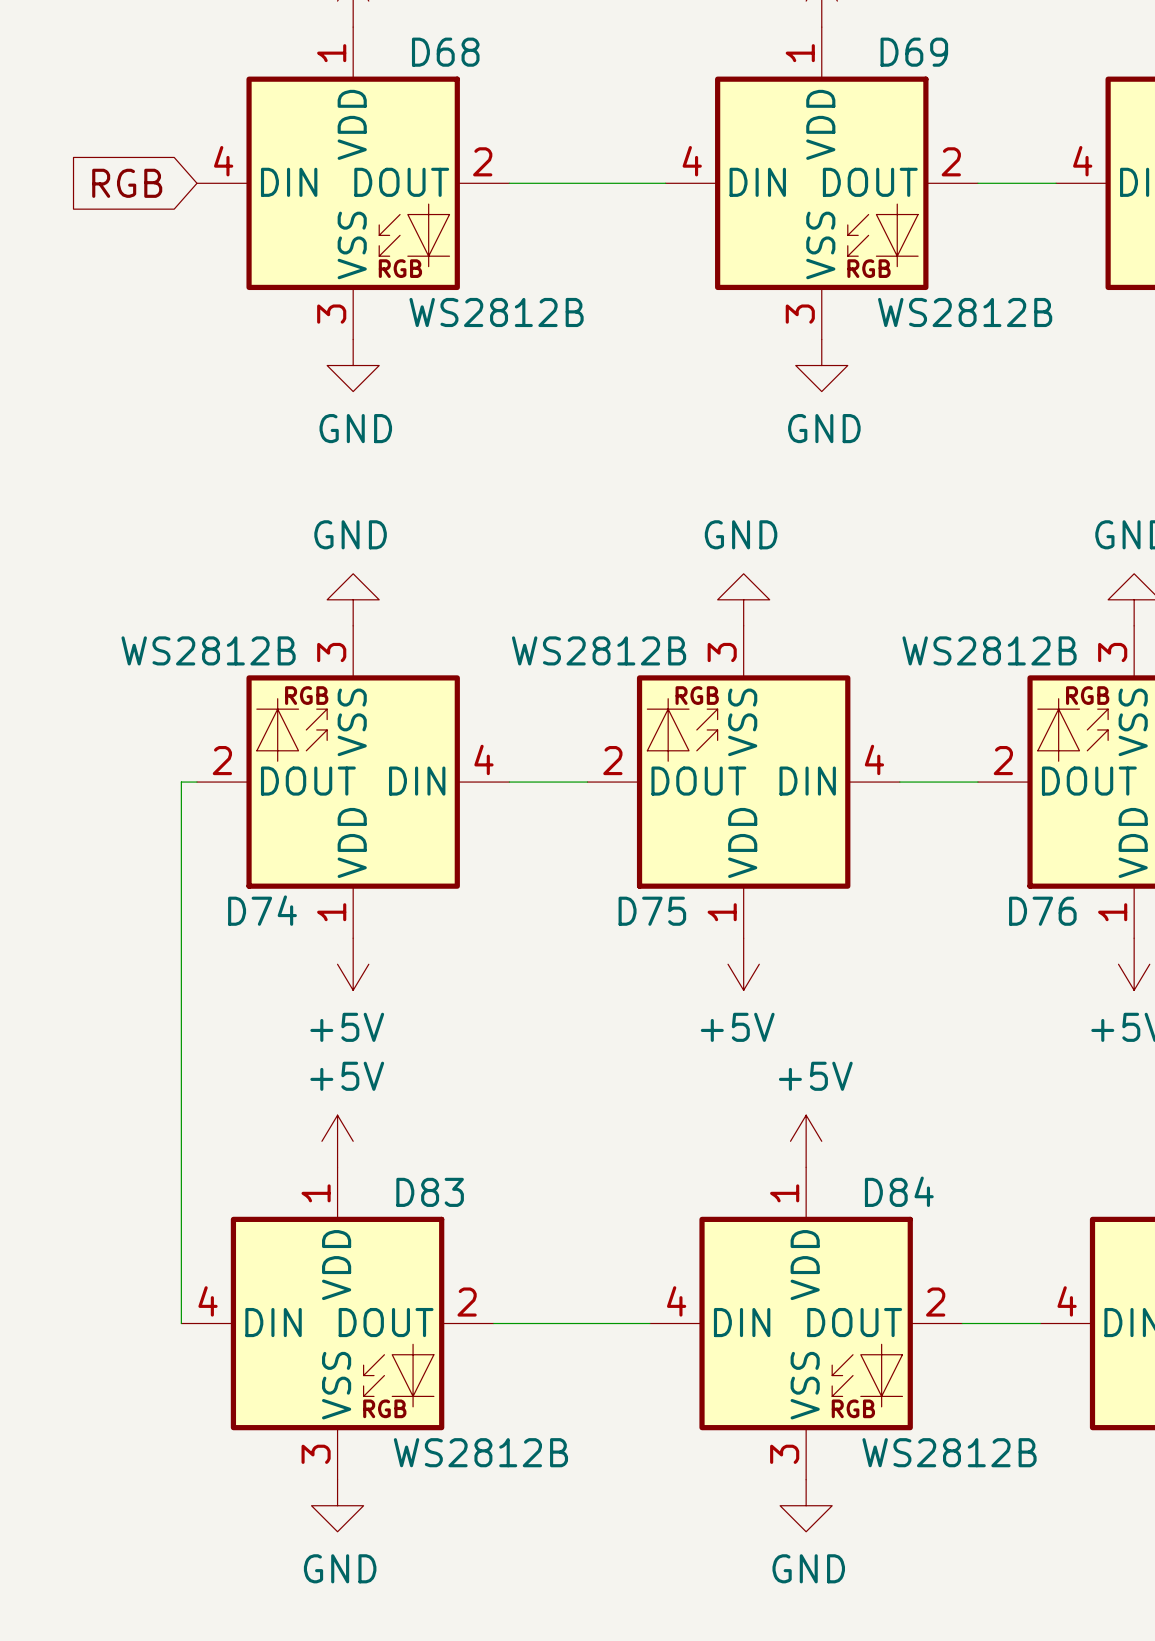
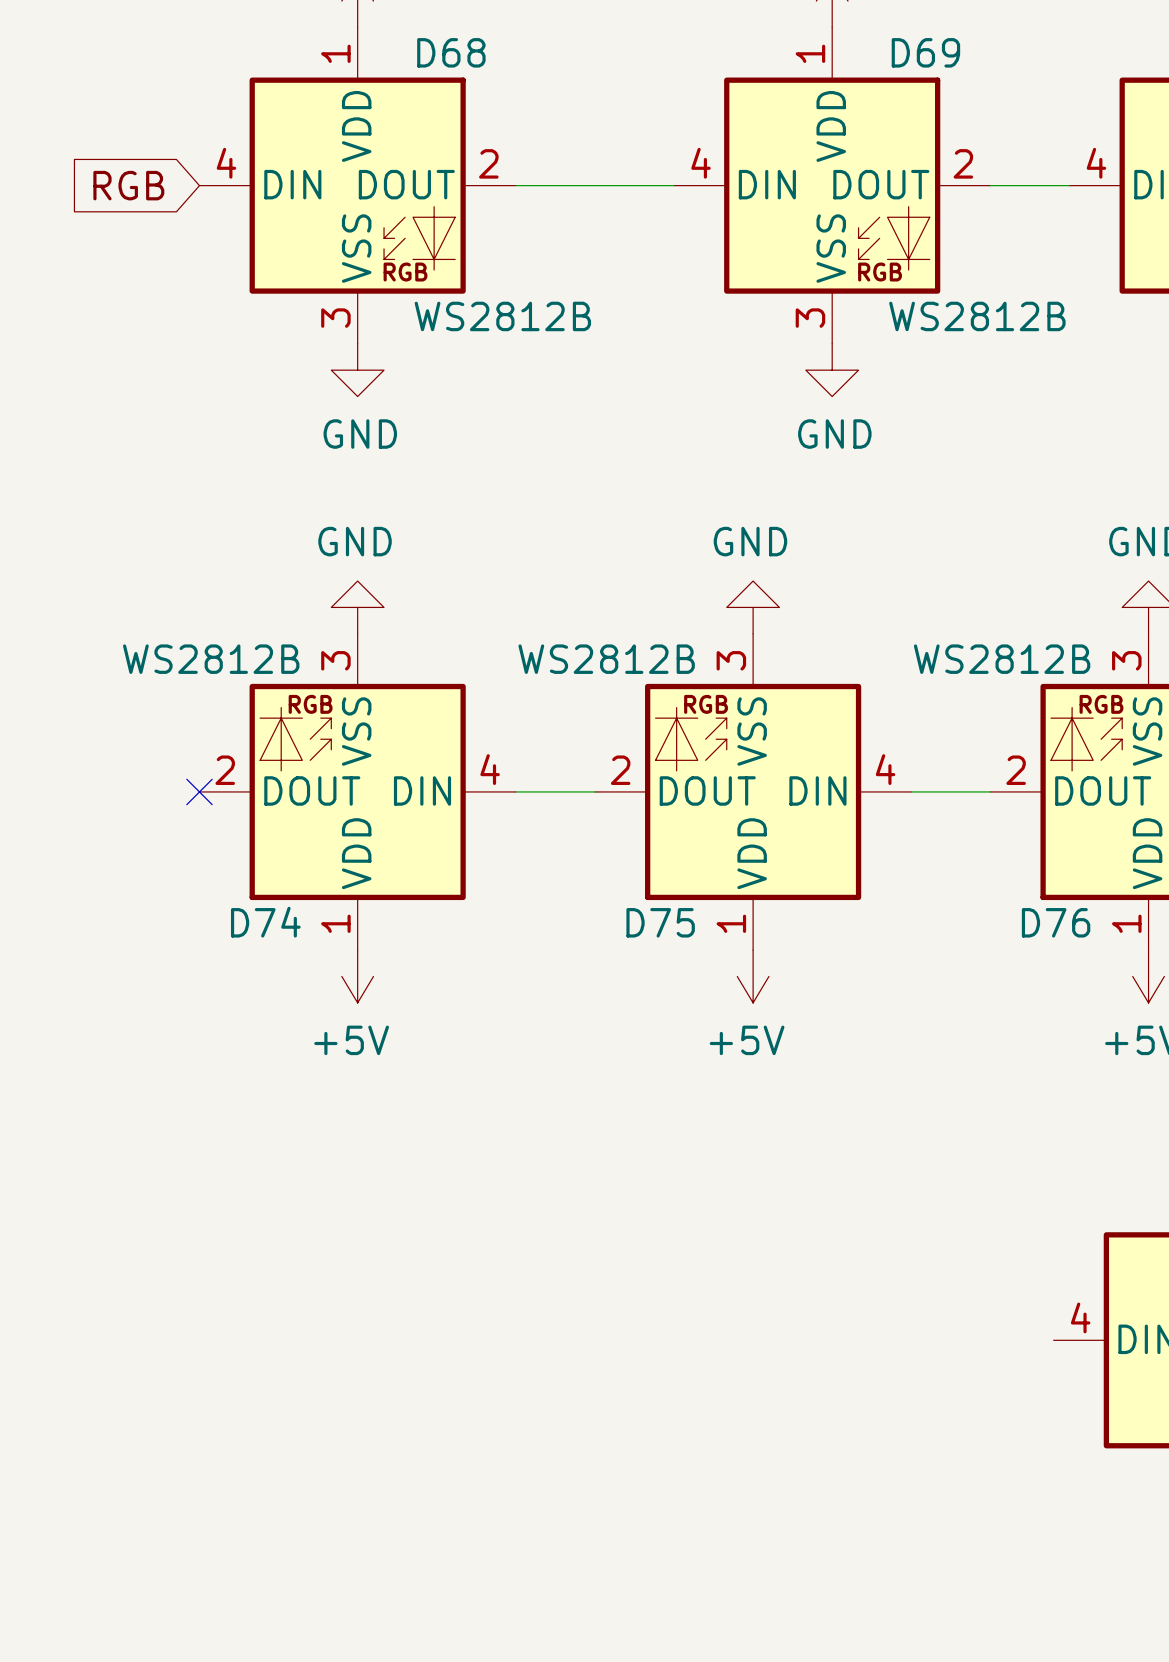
wire: (196, 782) (181, 782) (181, 1323) -> none
no-connect mark: none -> (199, 791)
power symbol: +5V (337, 1141) -> none
power symbol: +5V (806, 1141) -> none
D83: WS2812B (337, 1323) -> none
wire: (493, 1323) (649, 1323) -> none
D84: WS2812B (806, 1323) -> none
wire: (962, 1323) (1040, 1323) -> none
power symbol: GND (337, 1505) -> none
power symbol: GND (806, 1505) -> none

